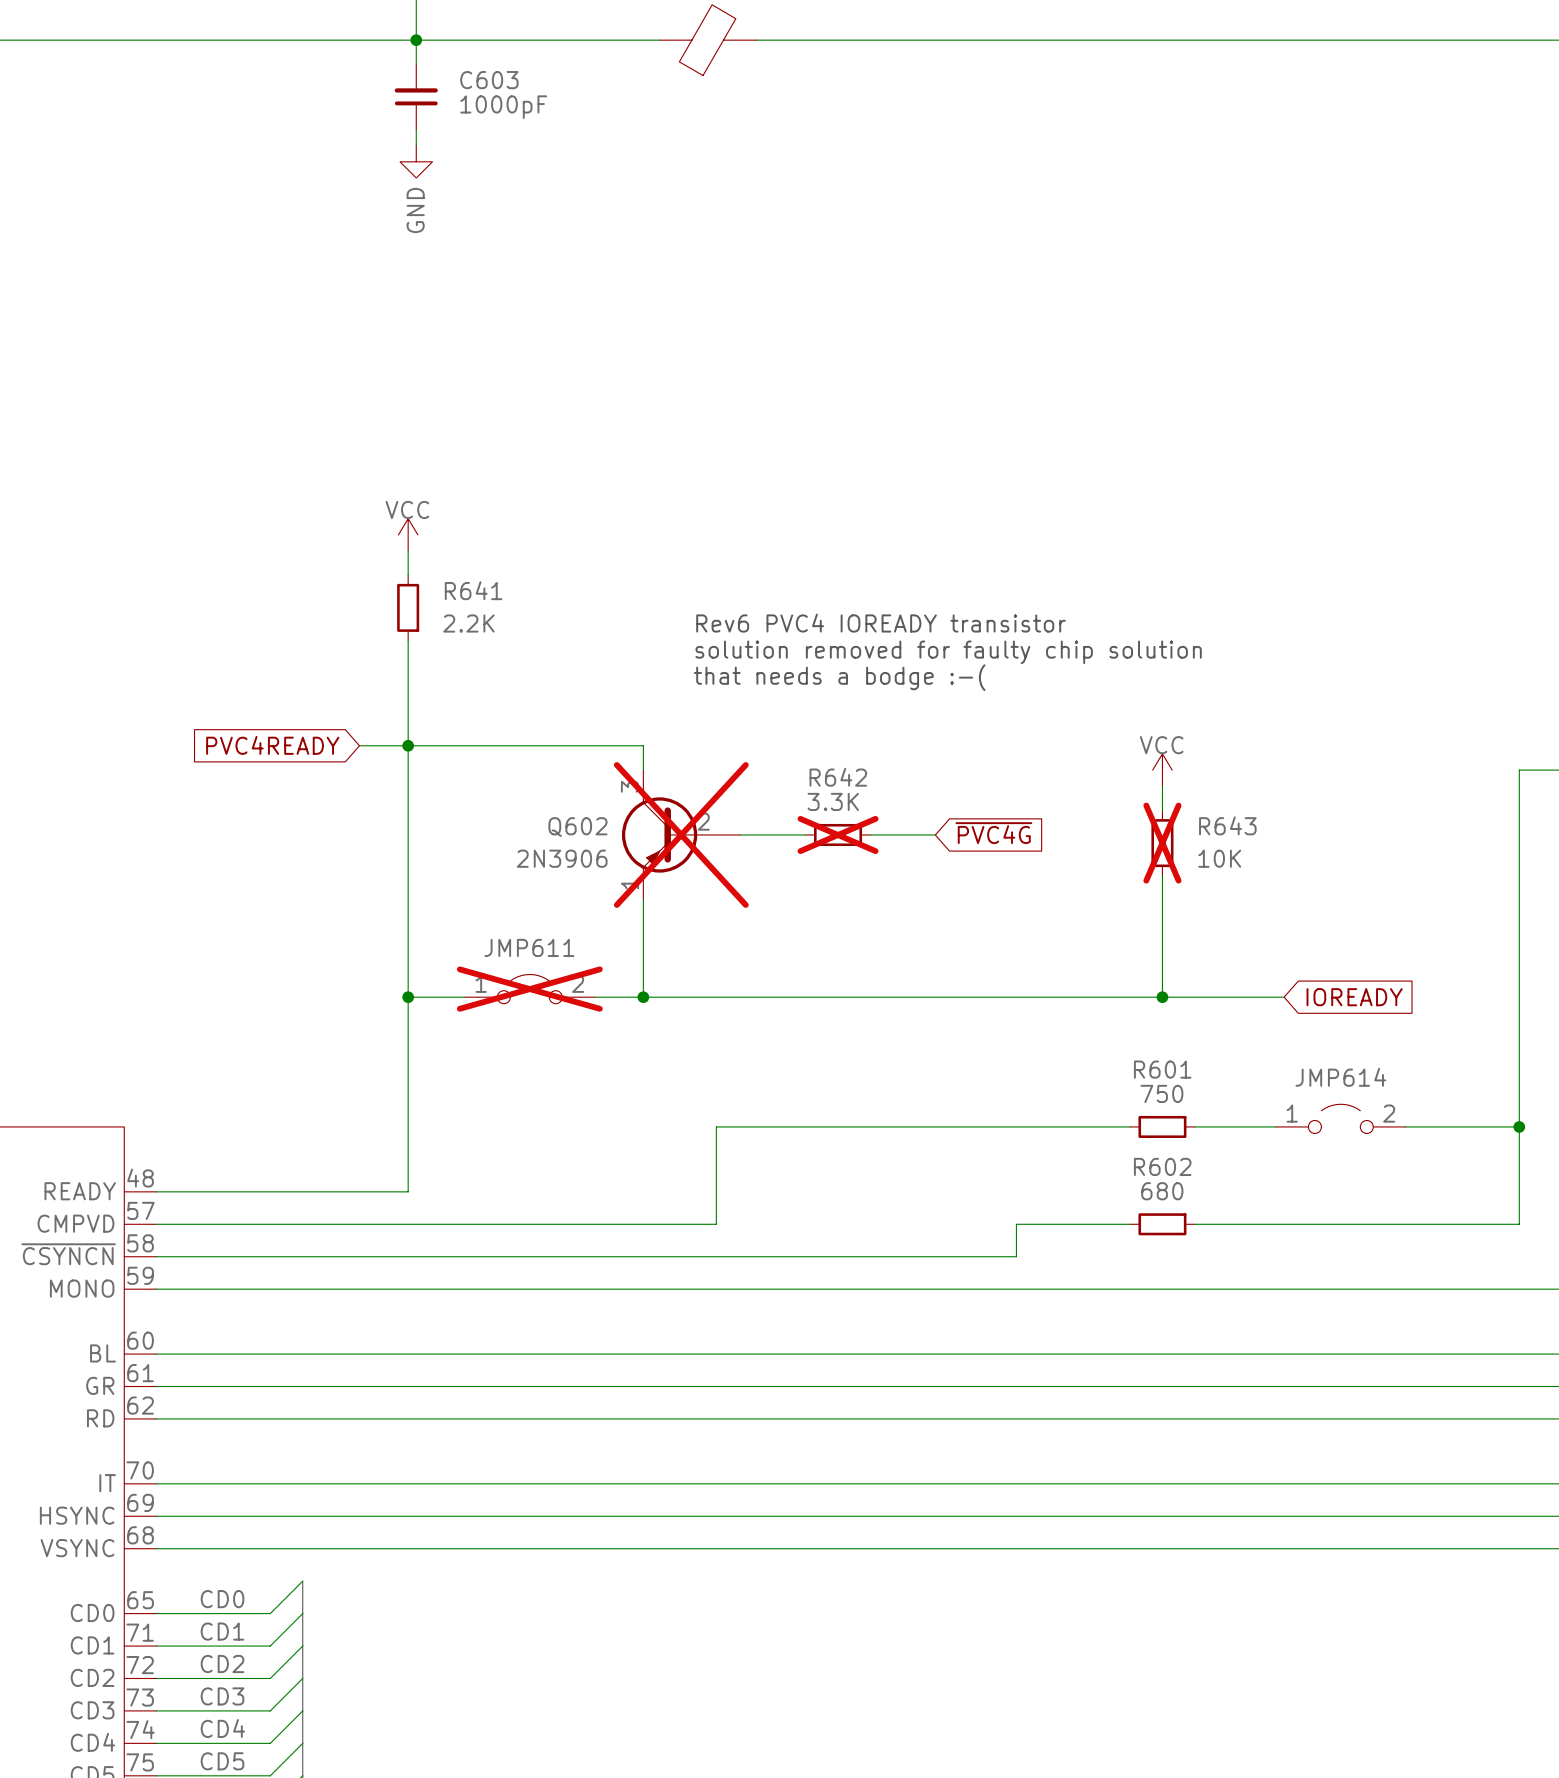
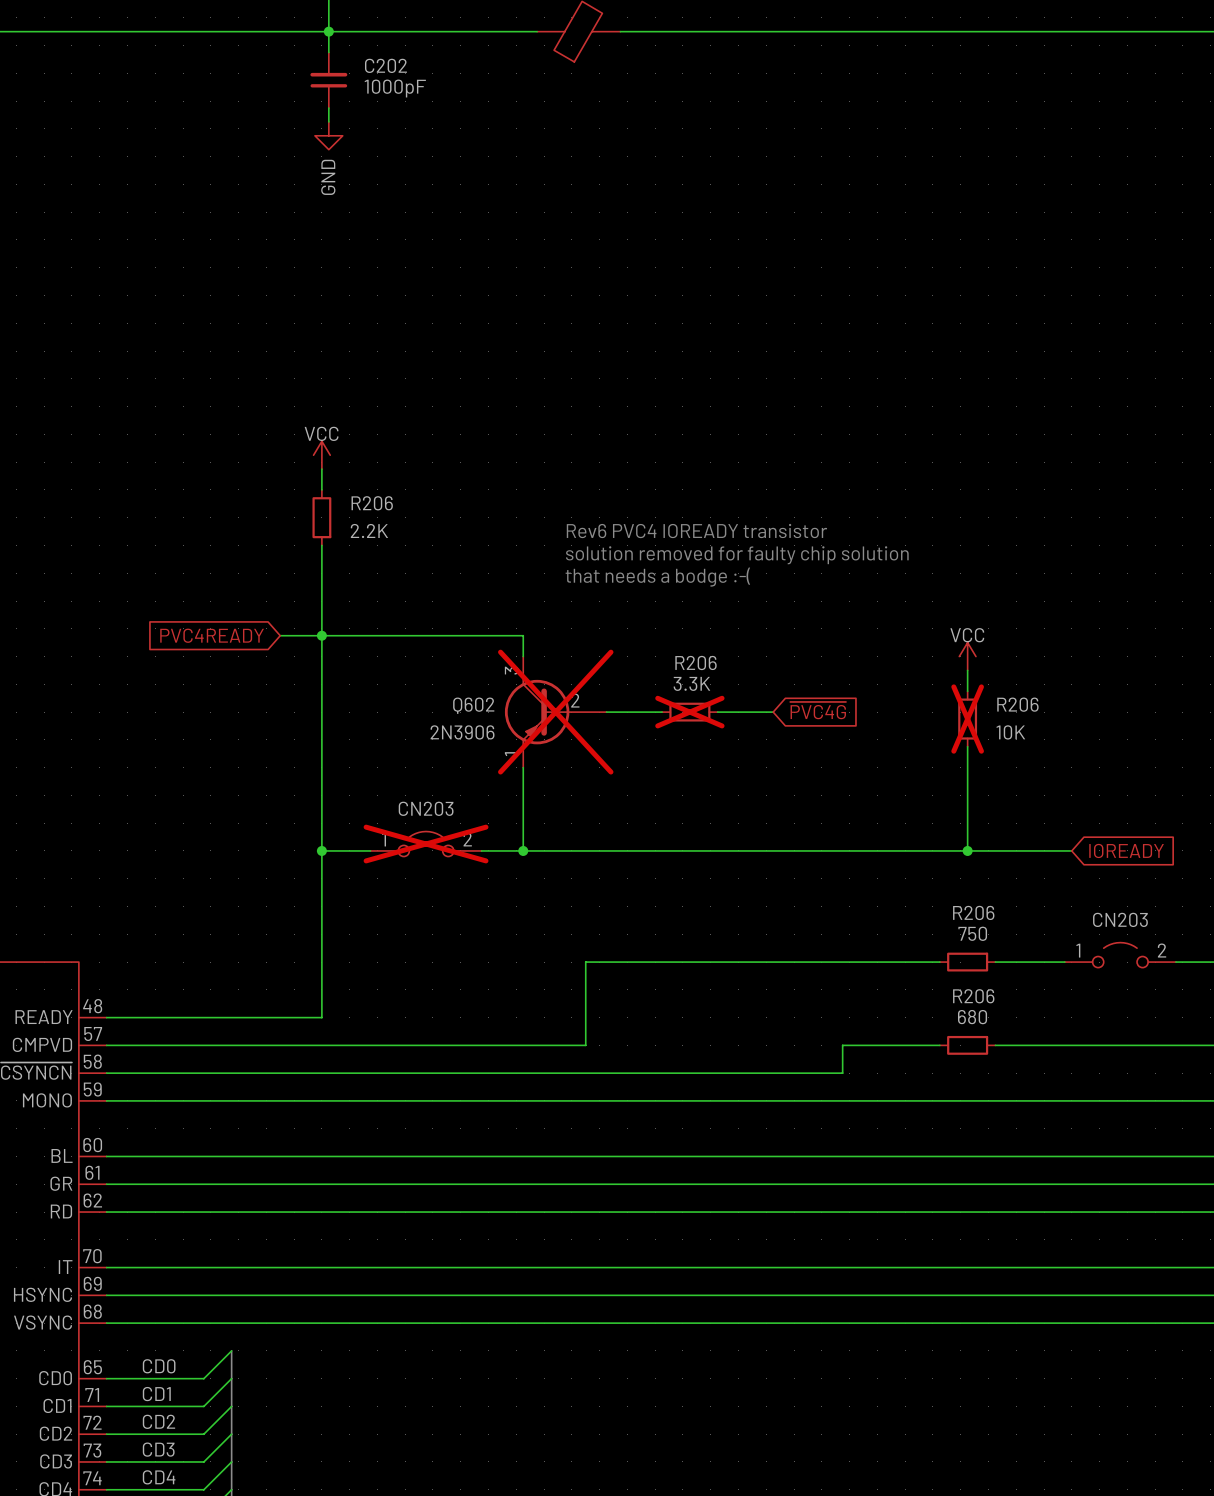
C603 name: C603 (489, 80) -> C202 (385, 65)
R641 name: R641 (473, 590) -> R206 (372, 503)
R642 name: R642 (838, 777) -> R206 (696, 662)
R643 name: R643 (1227, 825) -> R206 (1017, 704)
JMP611 name: JMP611 (529, 947) -> CN203 (426, 808)
R601 name: R601 (1162, 1069) -> R206 (973, 912)
JMP614 name: JMP614 (1340, 1077) -> CN203 (1120, 919)
R602 name: R602 (1162, 1166) -> R206 (973, 996)

